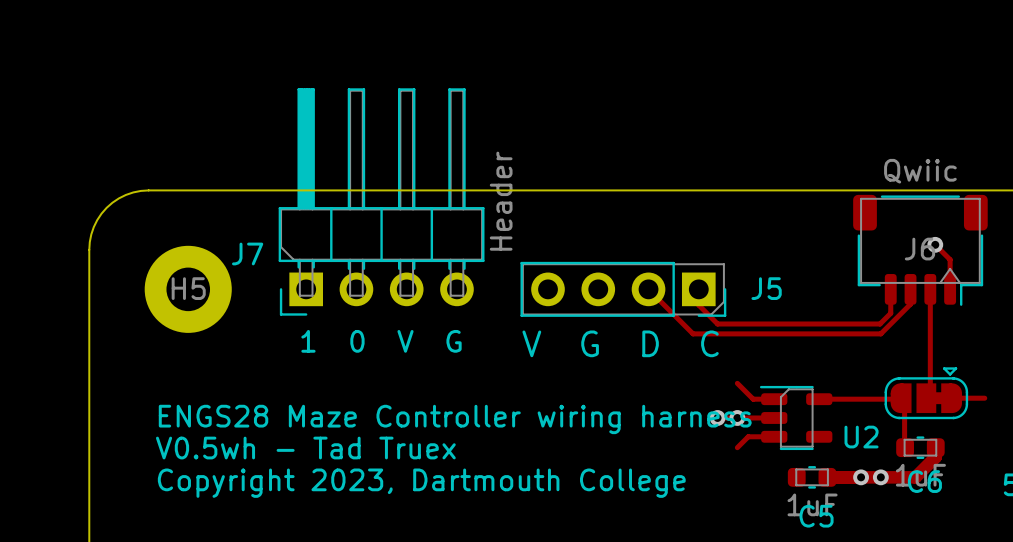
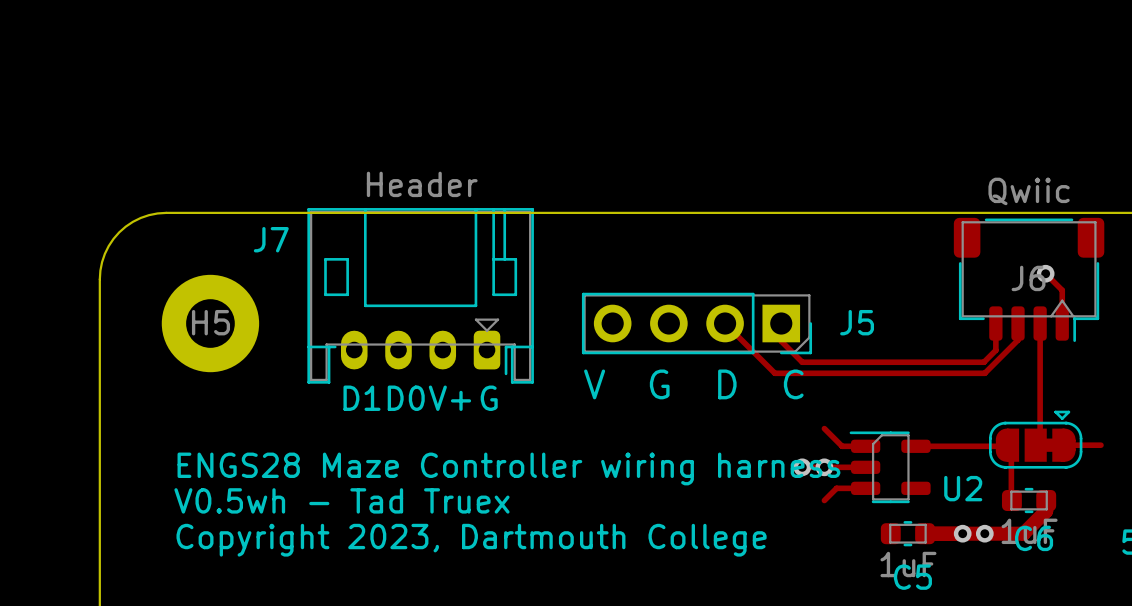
J7 footprint: [278, 88, 485, 316] -> [307, 208, 534, 384]
J7 value position: Header (501, 201) -> Header (422, 184)
J7 name position: J7 (247, 253) -> J7 (271, 239)
text: 1 0 V G (381, 341) -> D1 (361, 398)
text: none -> D0 (406, 398)
text: none -> V+ (449, 398)
text: none -> G (489, 398)

